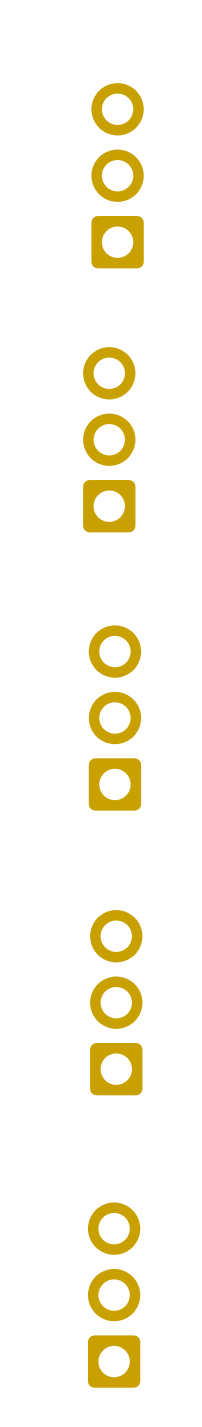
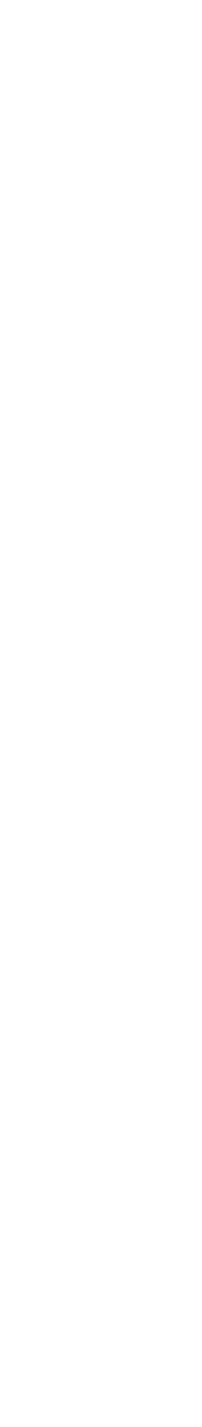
part: (117, 175) -> none
part: (109, 439) -> none
part: (114, 718) -> none
part: (116, 1002) -> none
part: (114, 1295) -> none

